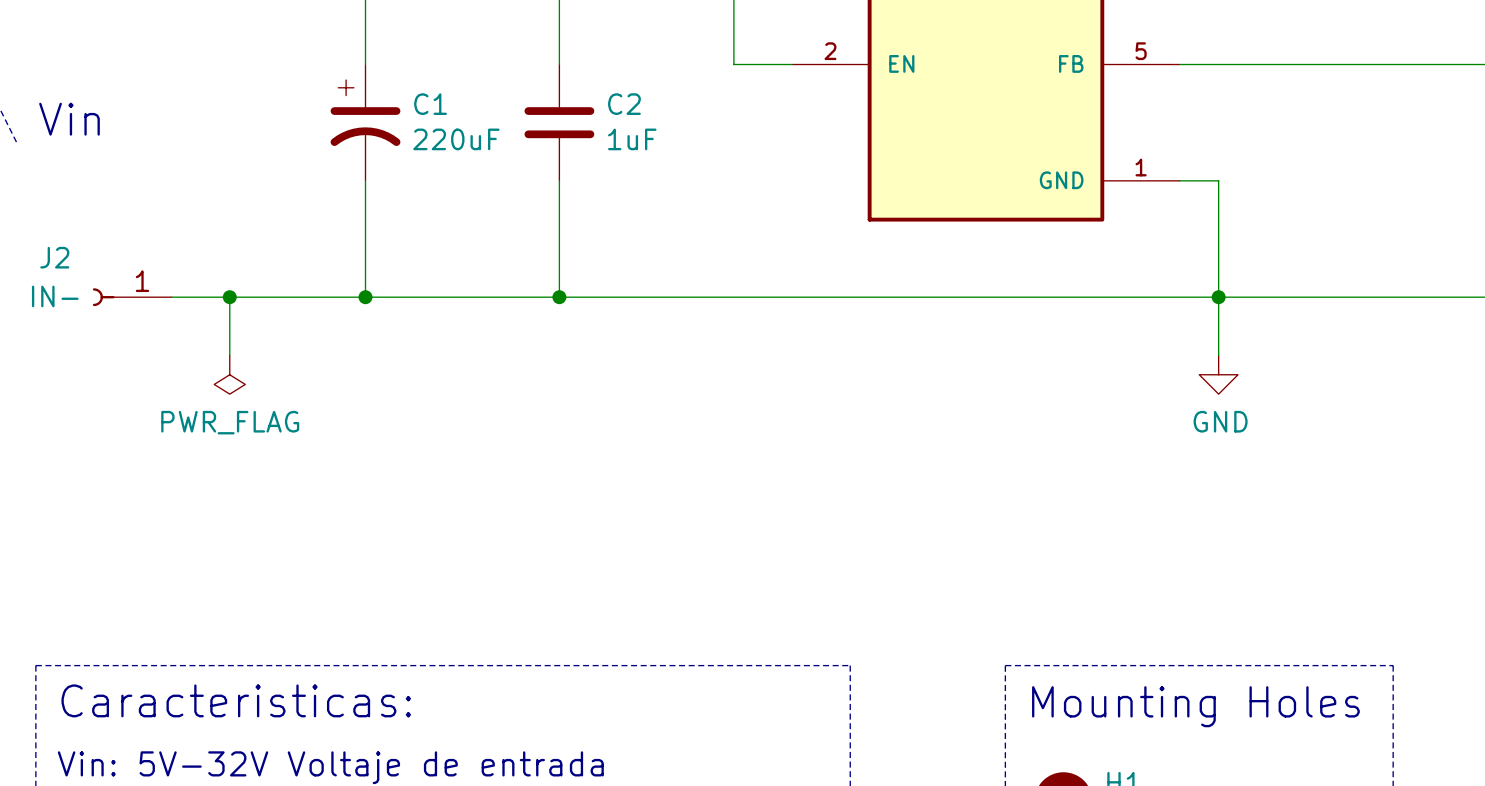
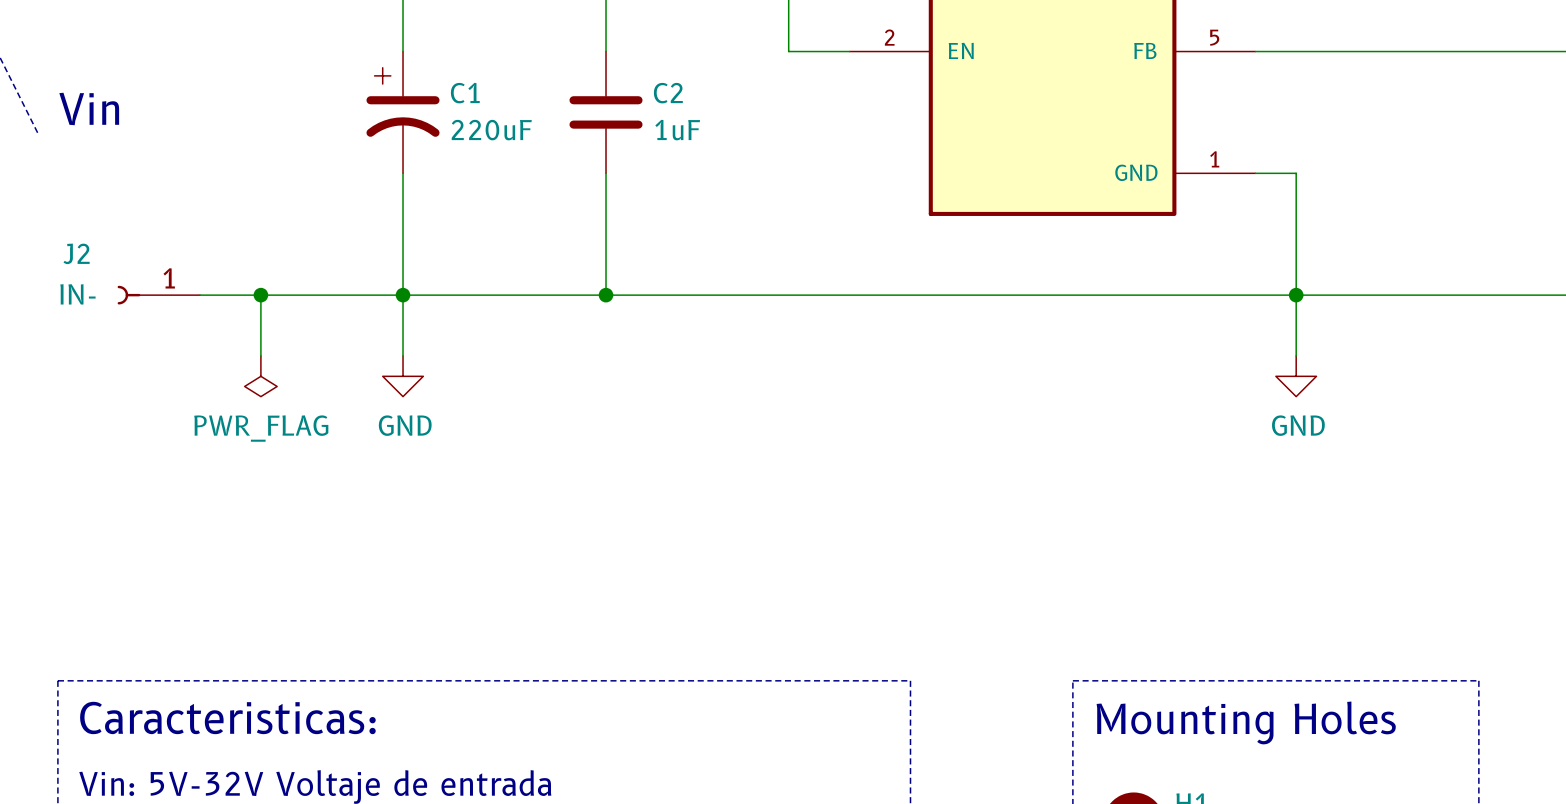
wire: none -> (403, 295) (403, 356)
power symbol: none -> GND (403, 376)

